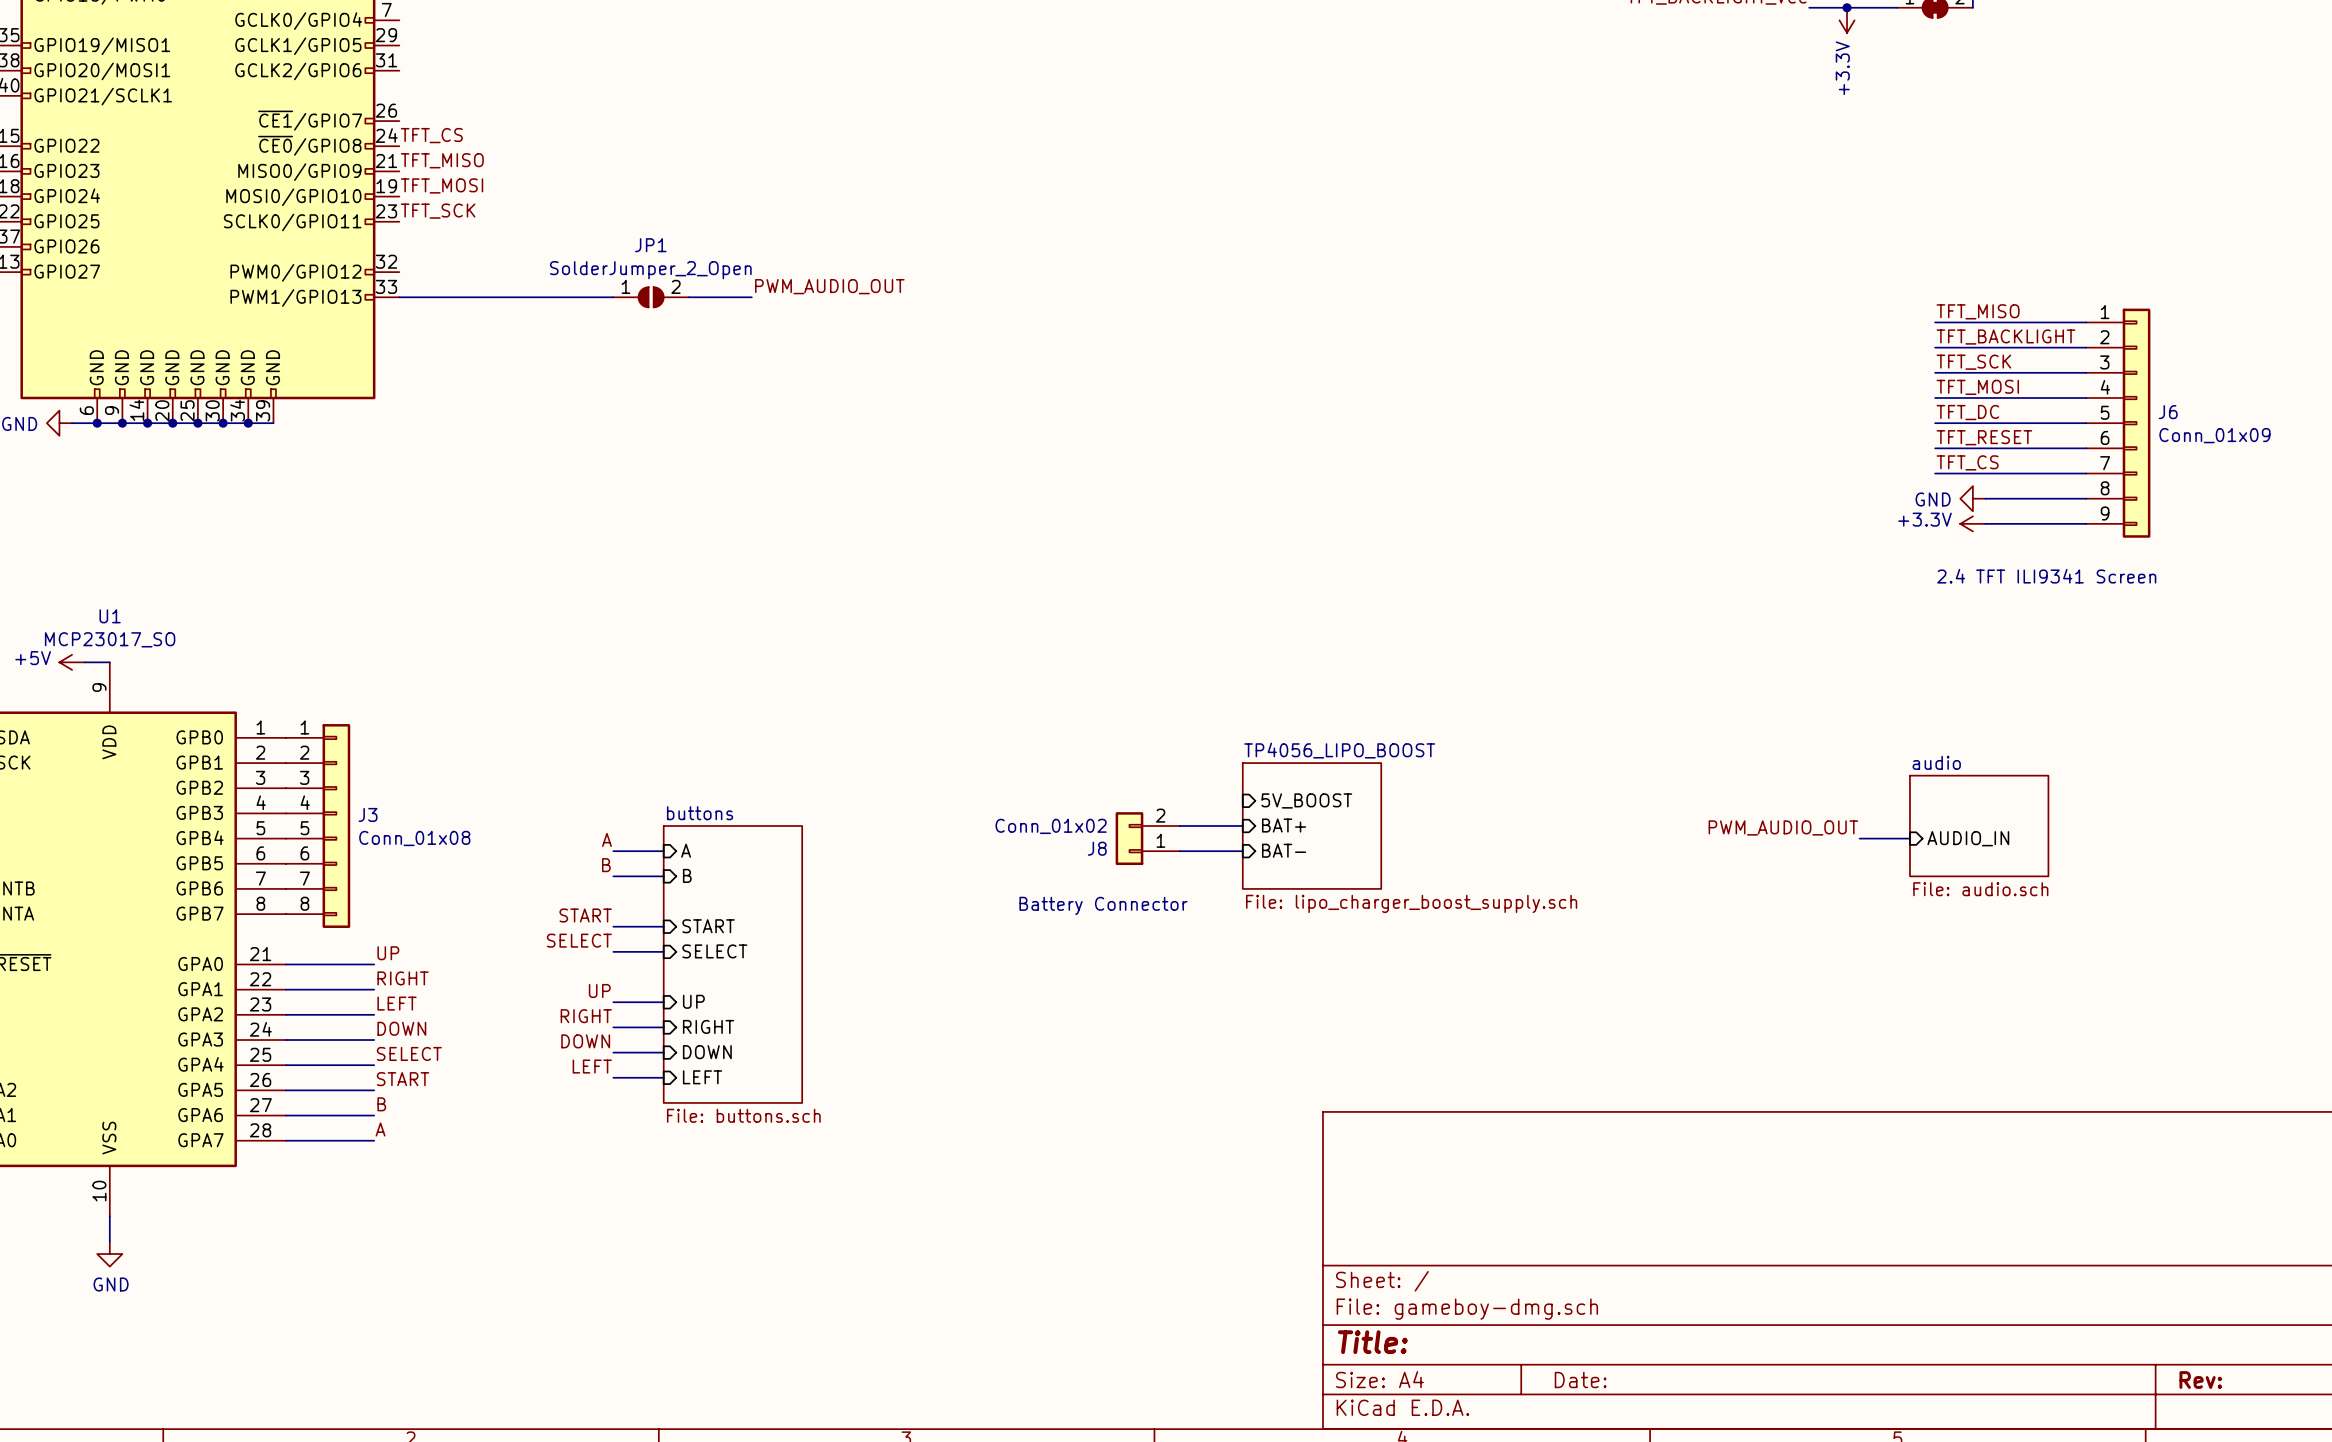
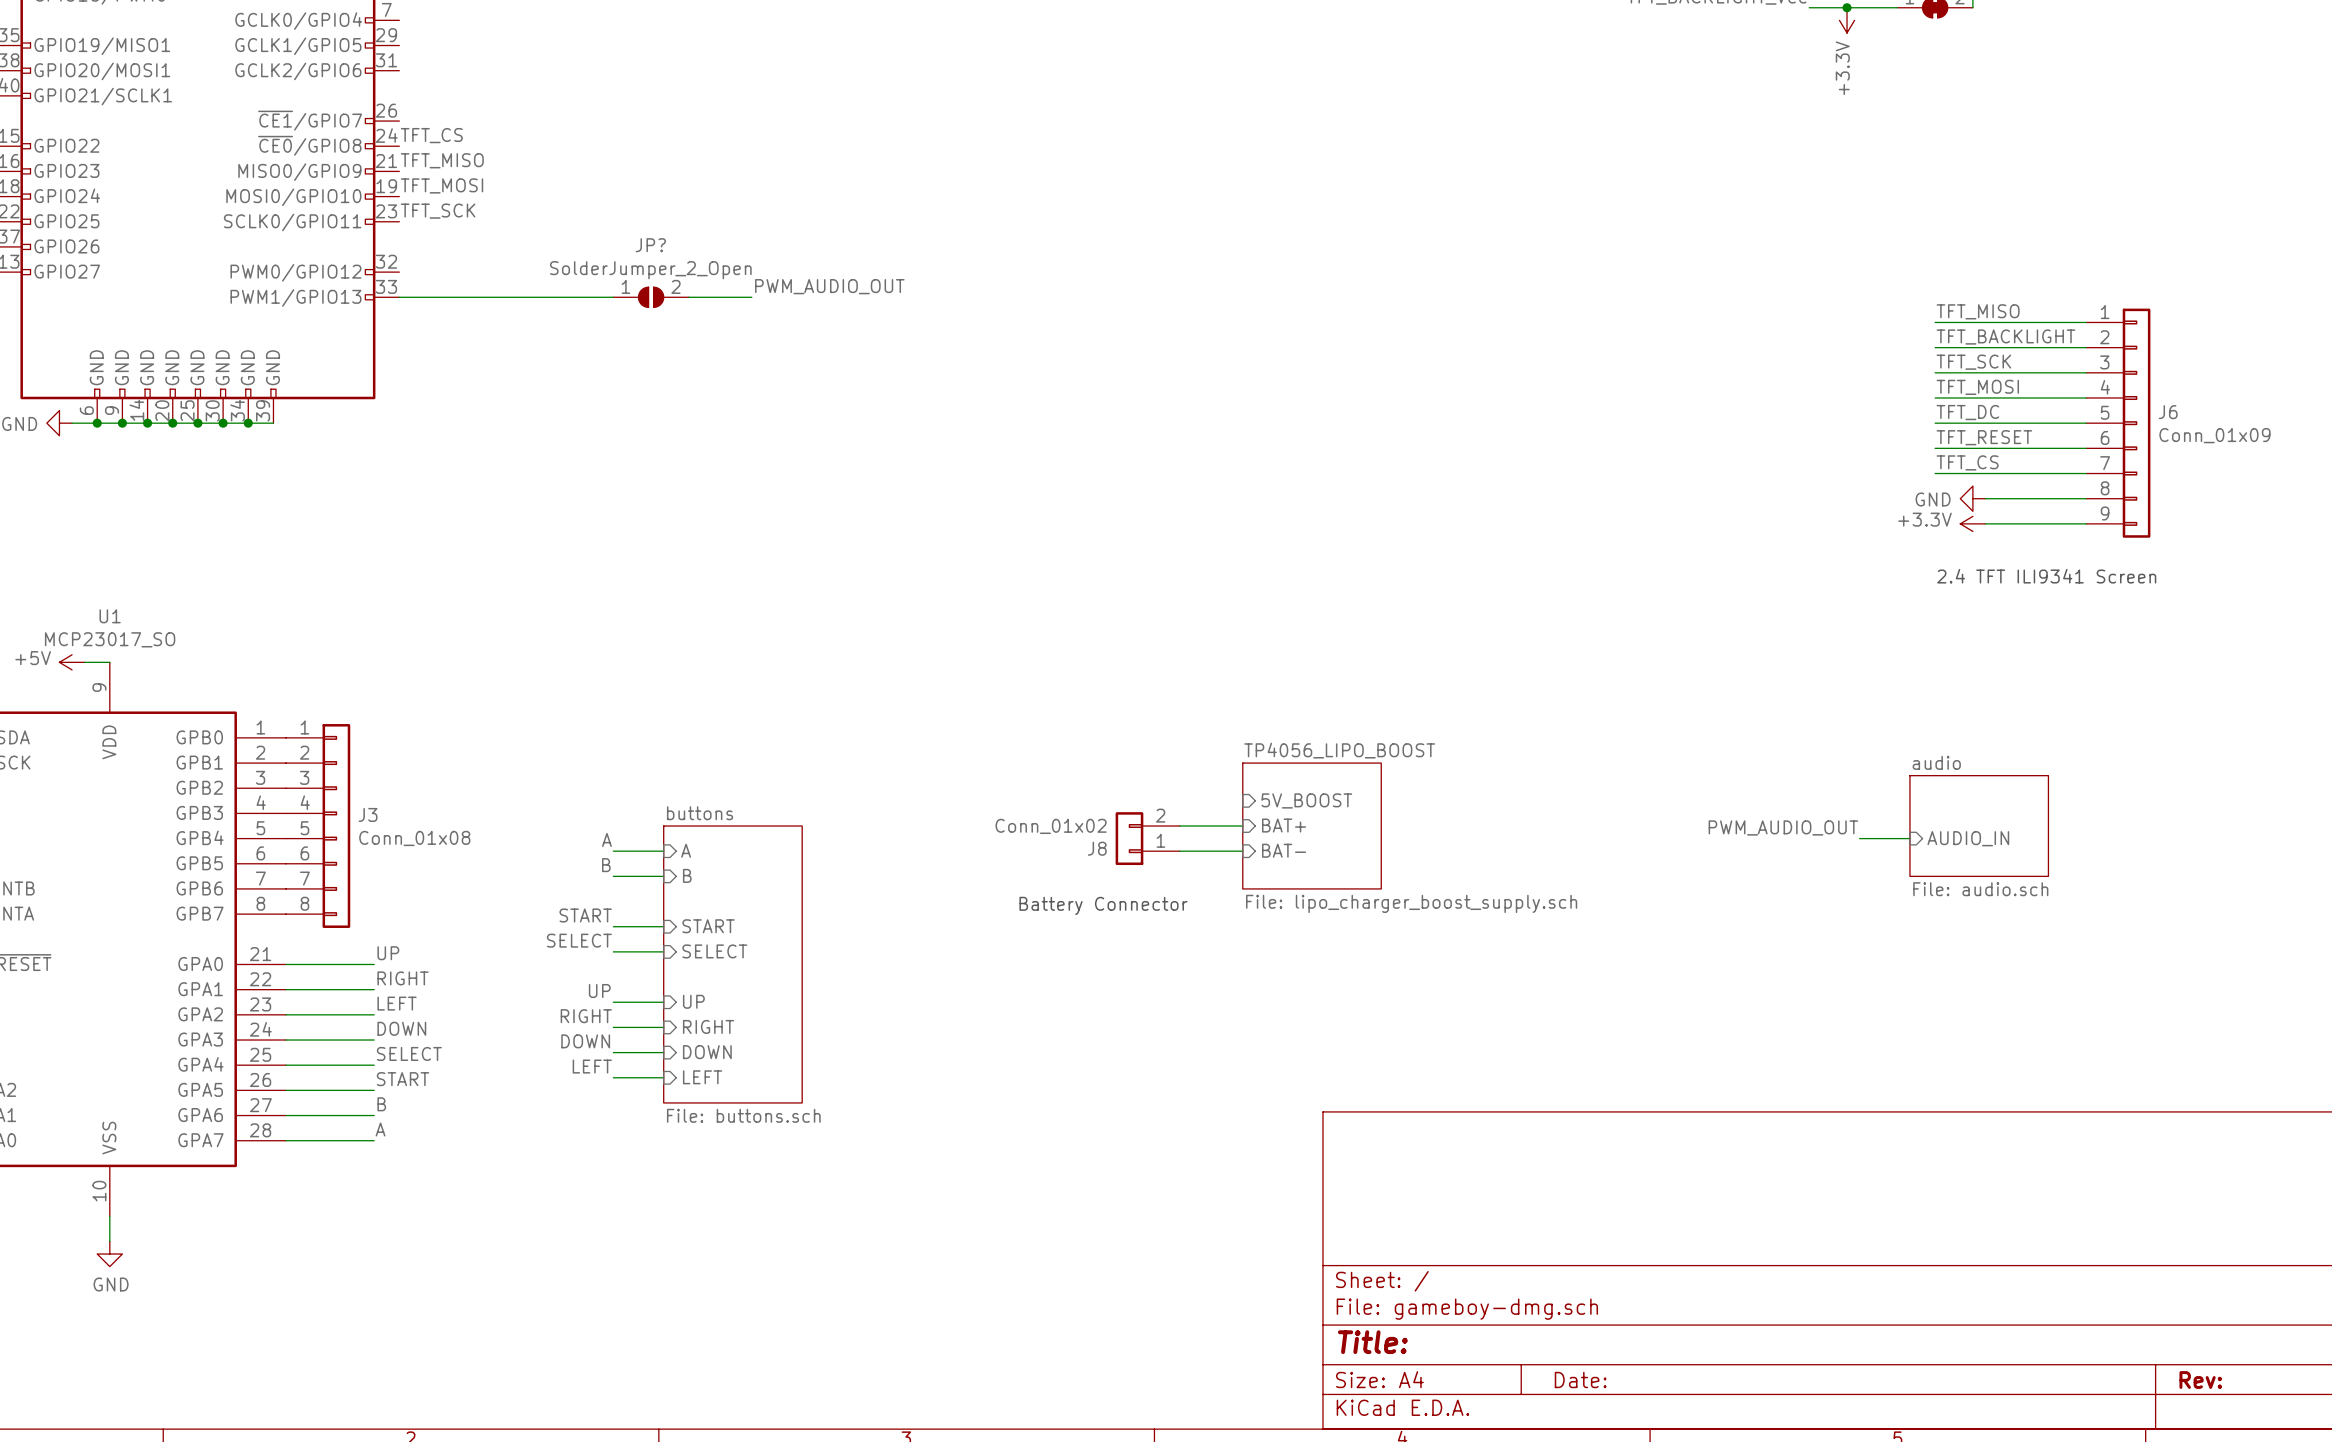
JP1 name: JP1 (650, 245) -> JP? (650, 245)

